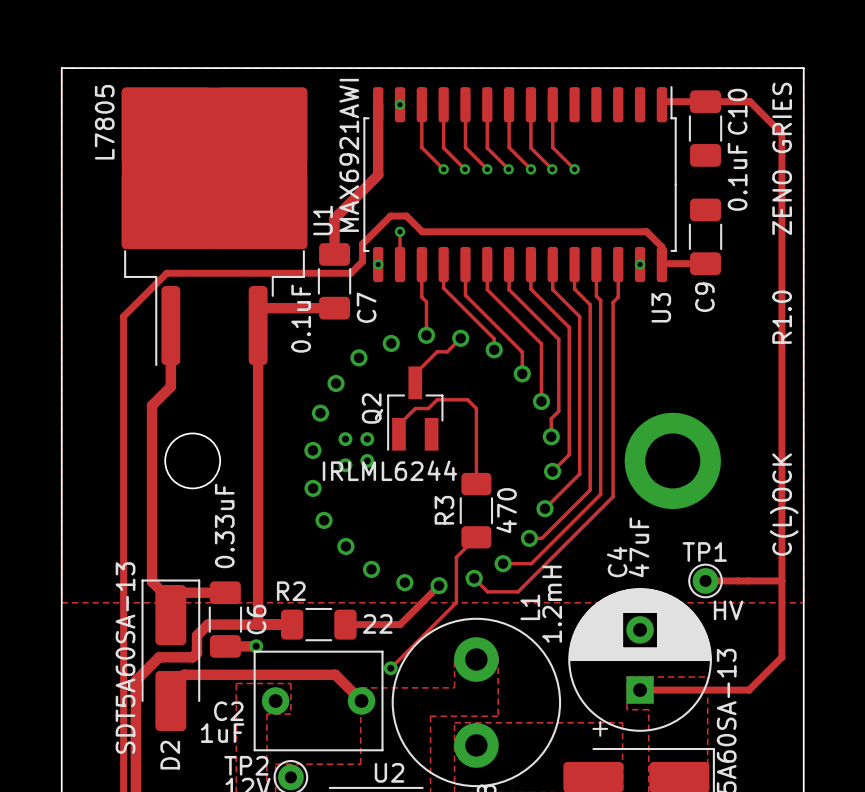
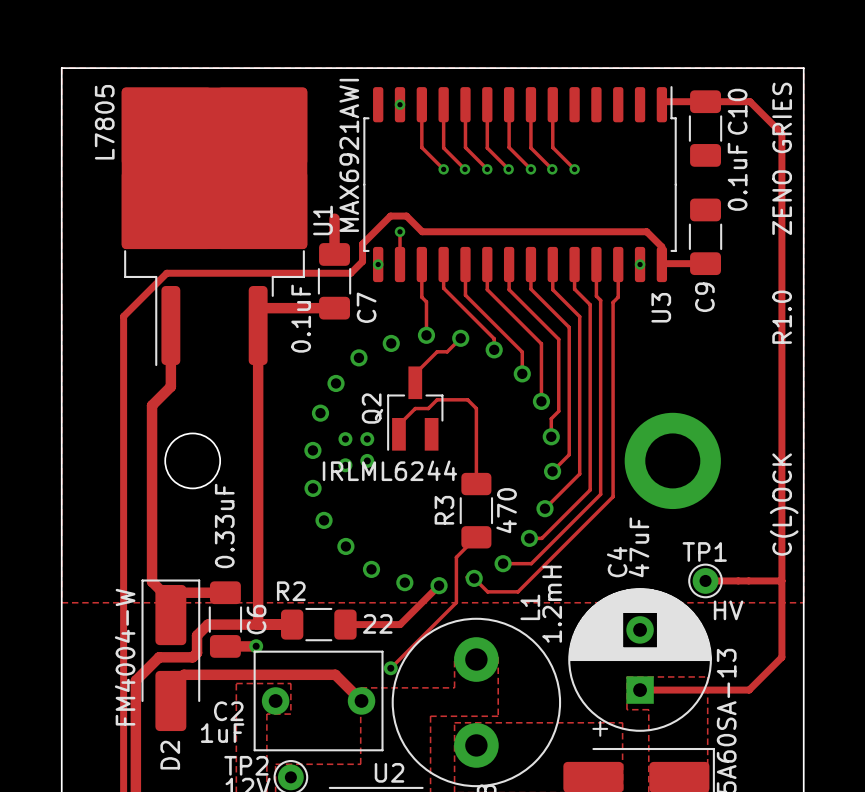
track: (378, 104) (378, 175) (334, 218) -> none
D2 value: SDT5A60SA-13 (125, 658) -> FM4004-W (125, 657)

